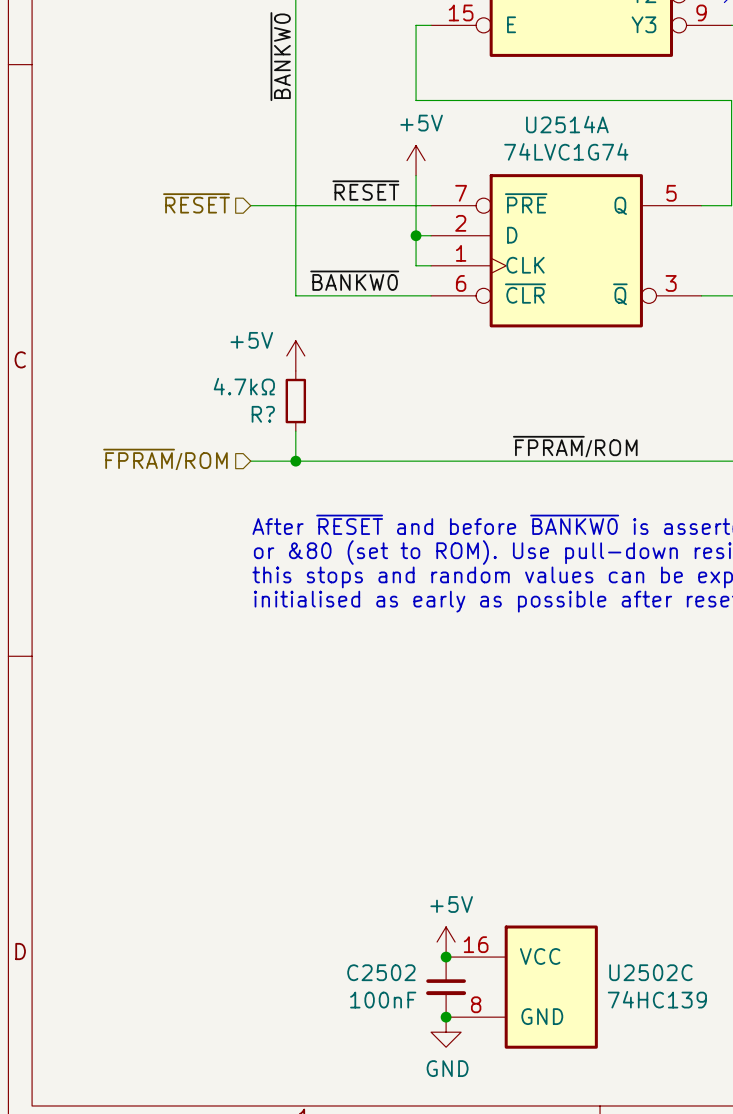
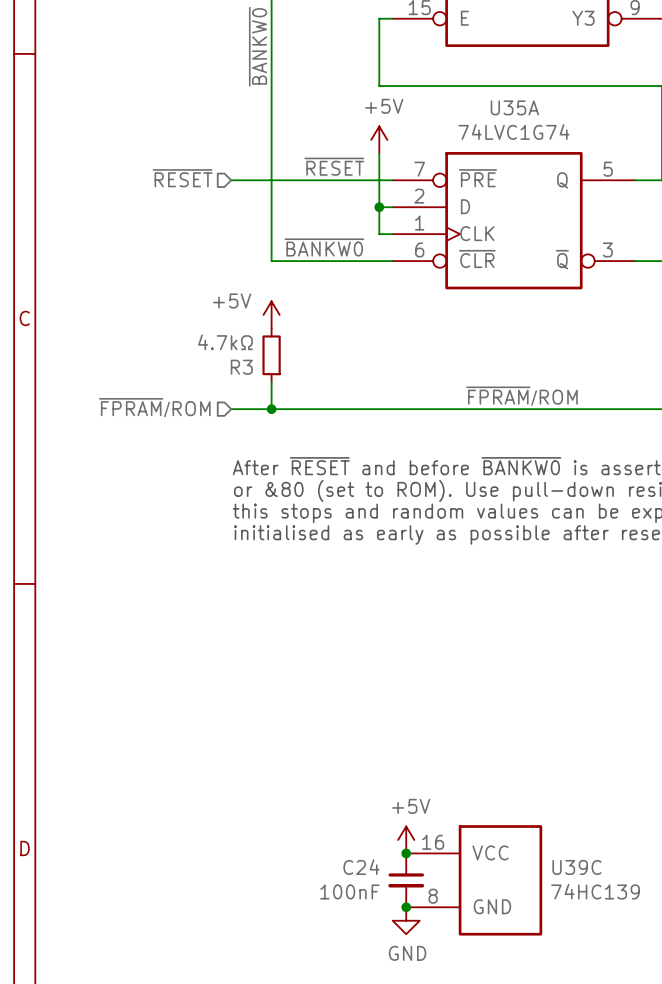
U2514A name: U2514A (567, 124) -> U35A (514, 107)
R? name: R? (263, 414) -> R3 (241, 367)
C2502 name: C2502 (381, 972) -> C24 (361, 867)
U2502C name: U2502C (650, 972) -> U39C (576, 867)

